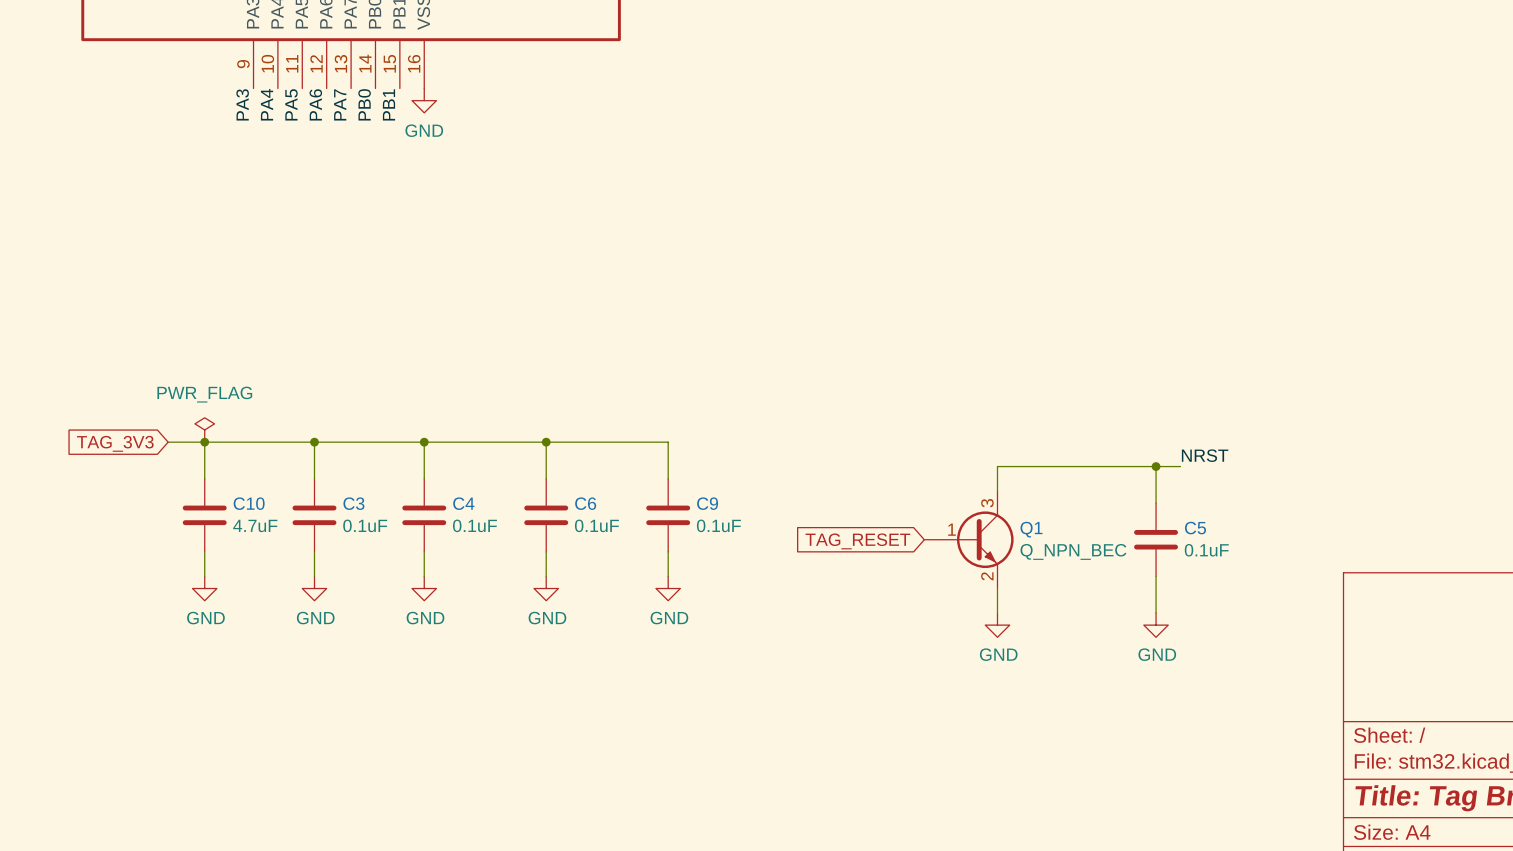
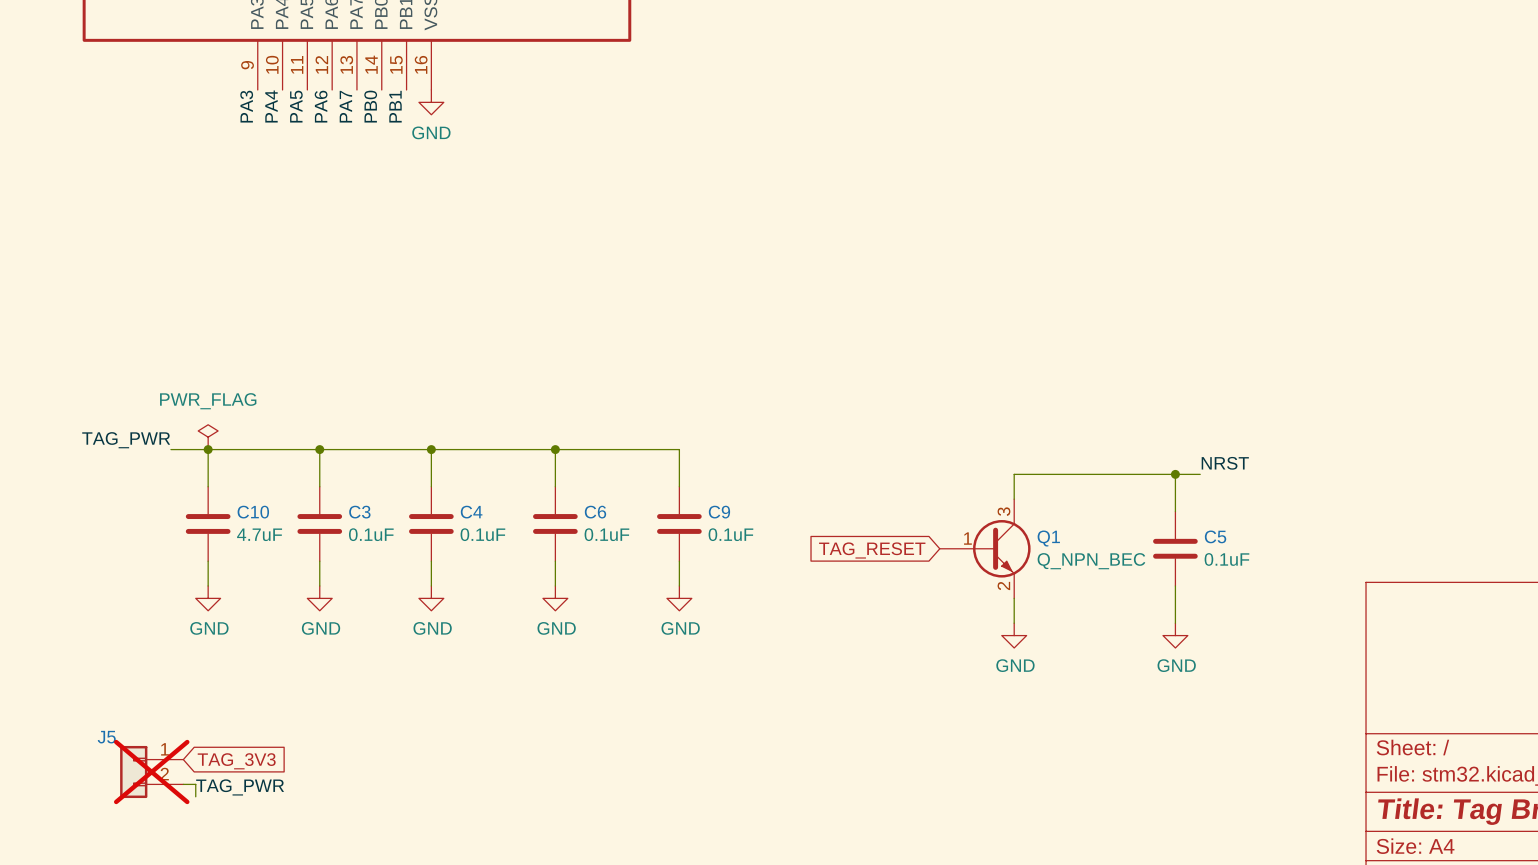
label: none -> TAG_PWR (126, 440)
global label: TAG_3V3 (115, 443) -> none
global label: none -> TAG_3V3 (236, 761)
J5: none -> (151, 771)
wire: none -> (183, 784) (195, 784) (195, 796)
label: none -> TAG_PWR (240, 787)

